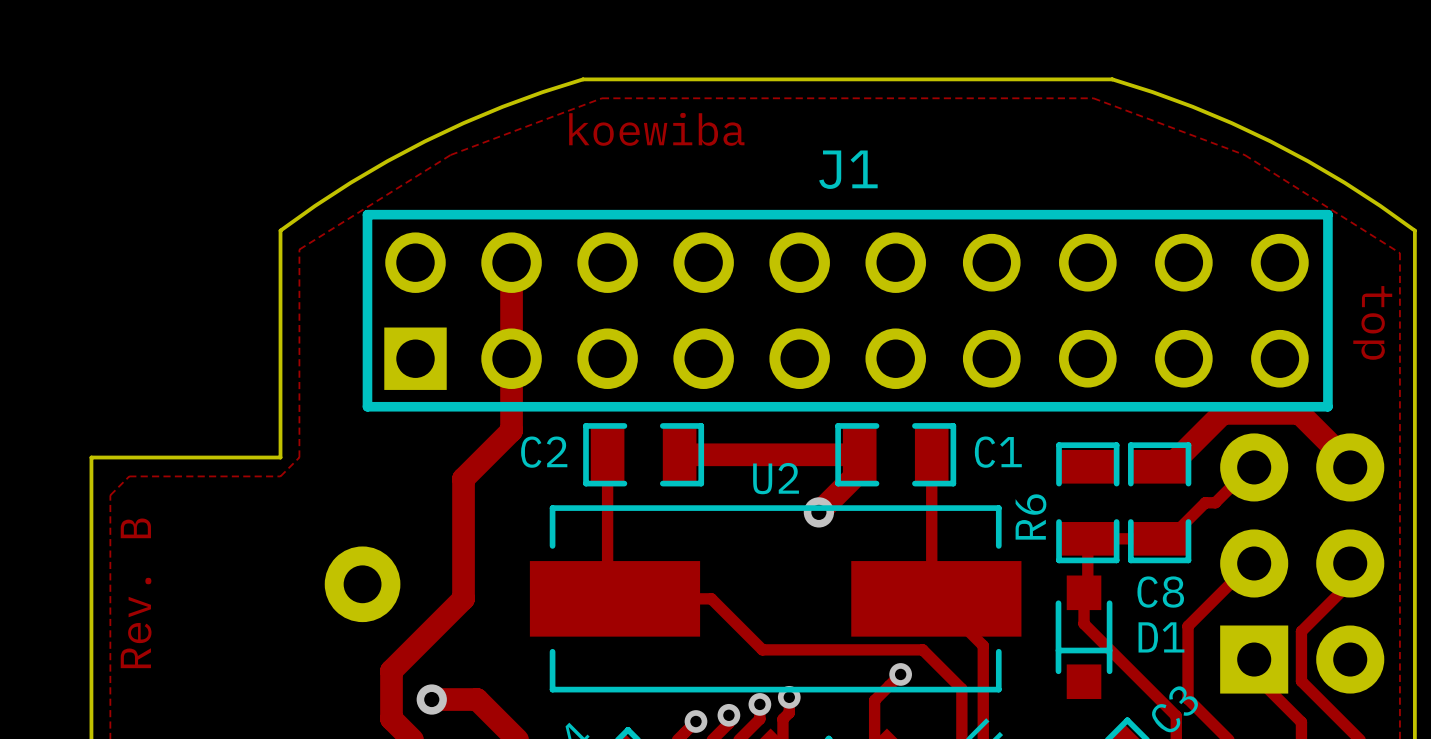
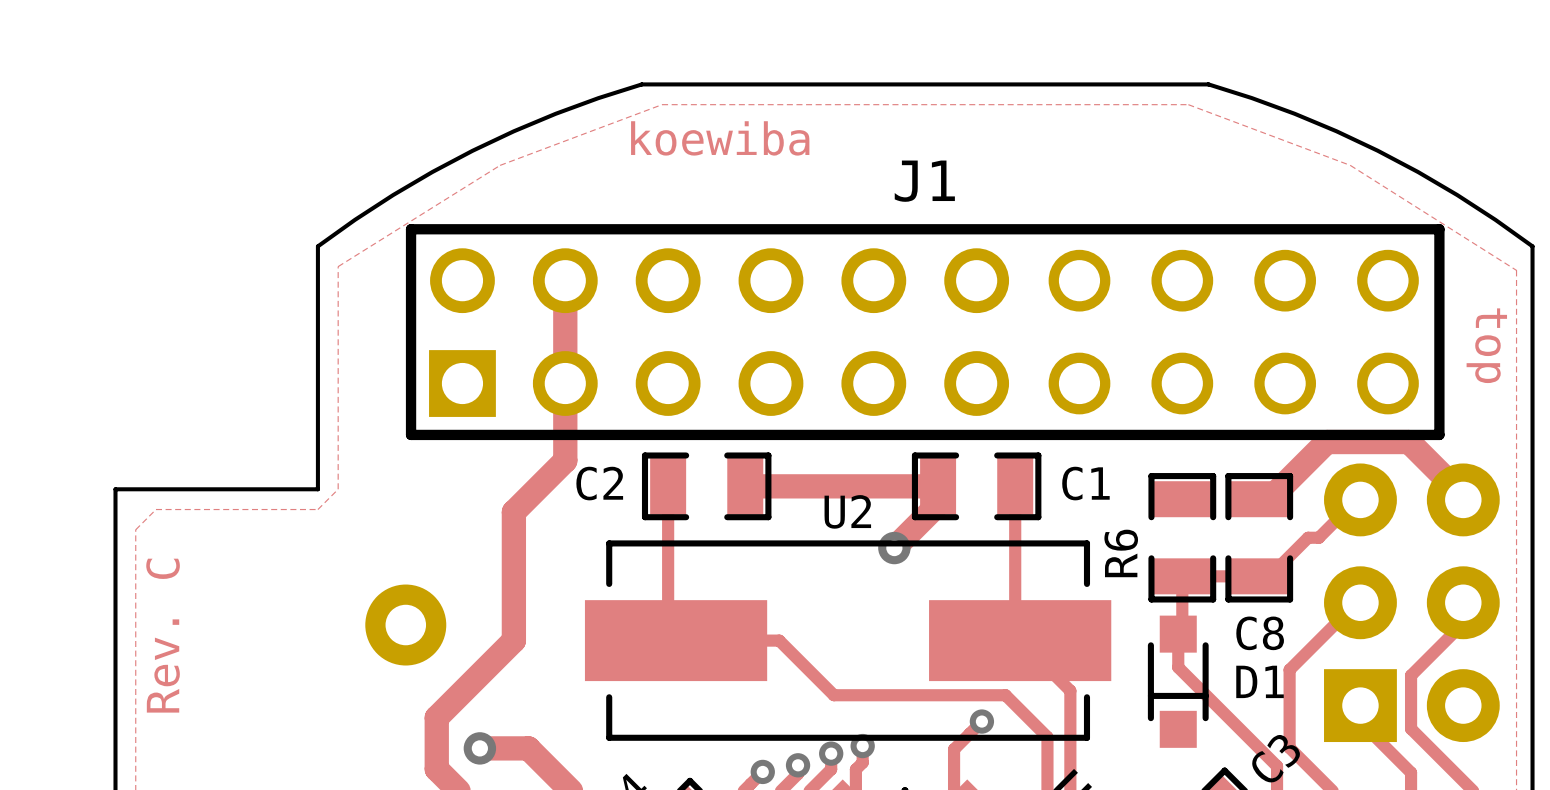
text: Rev. B (136, 593) -> Rev. C (163, 635)

